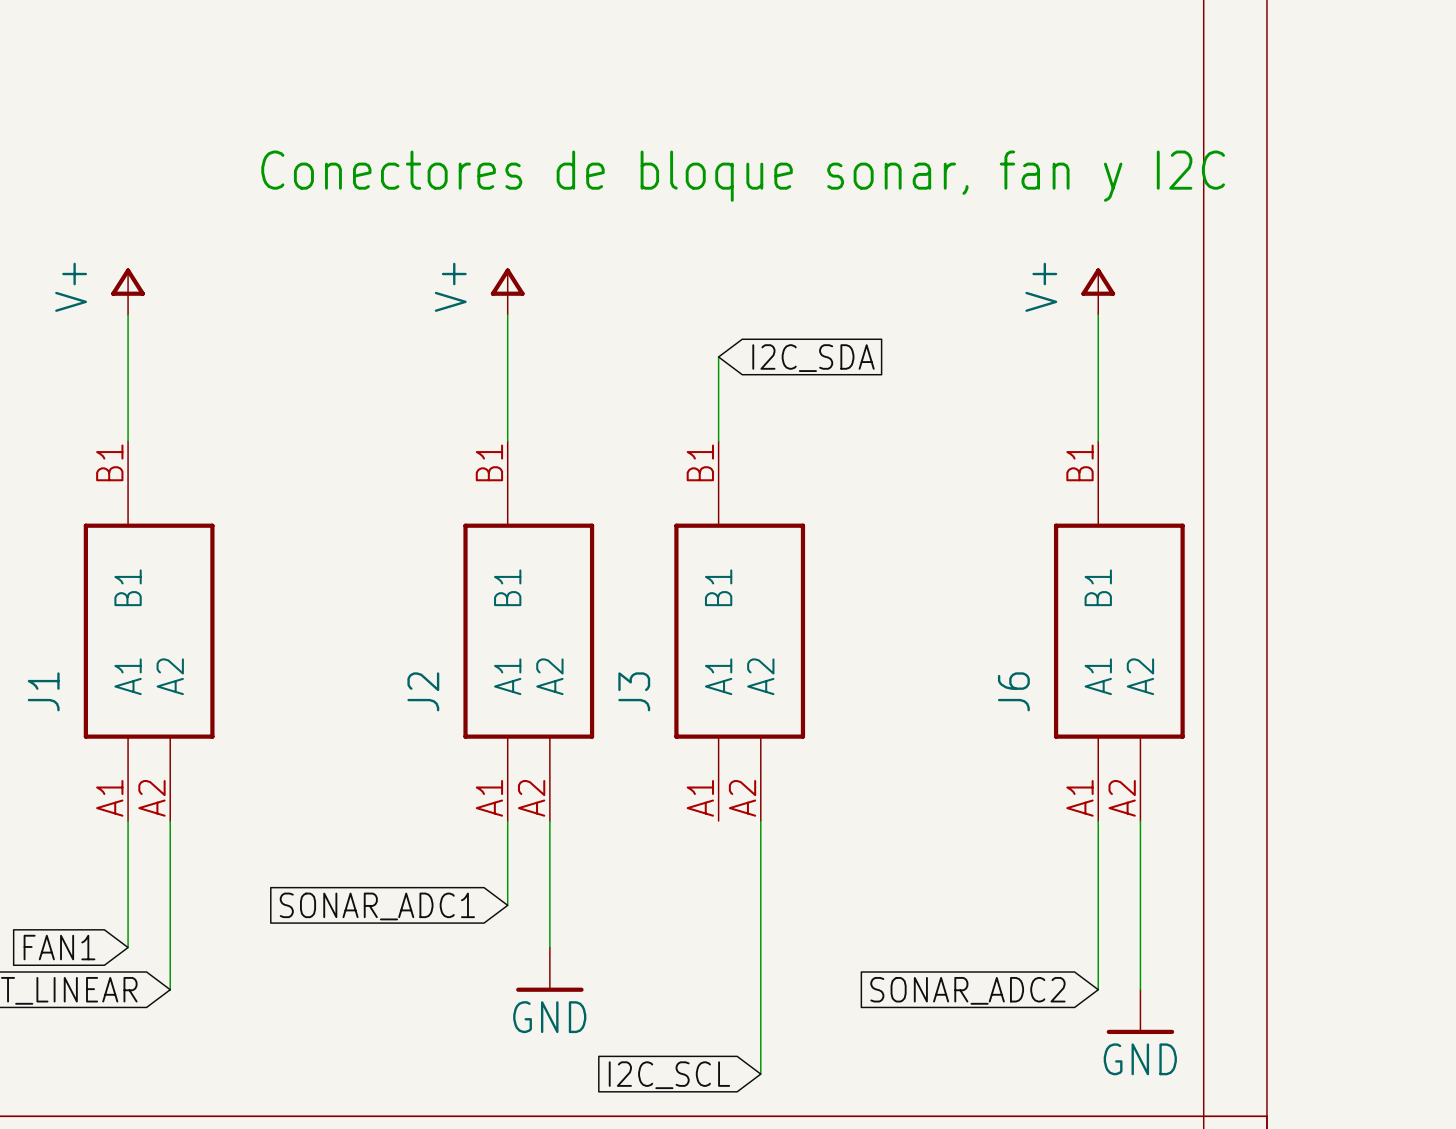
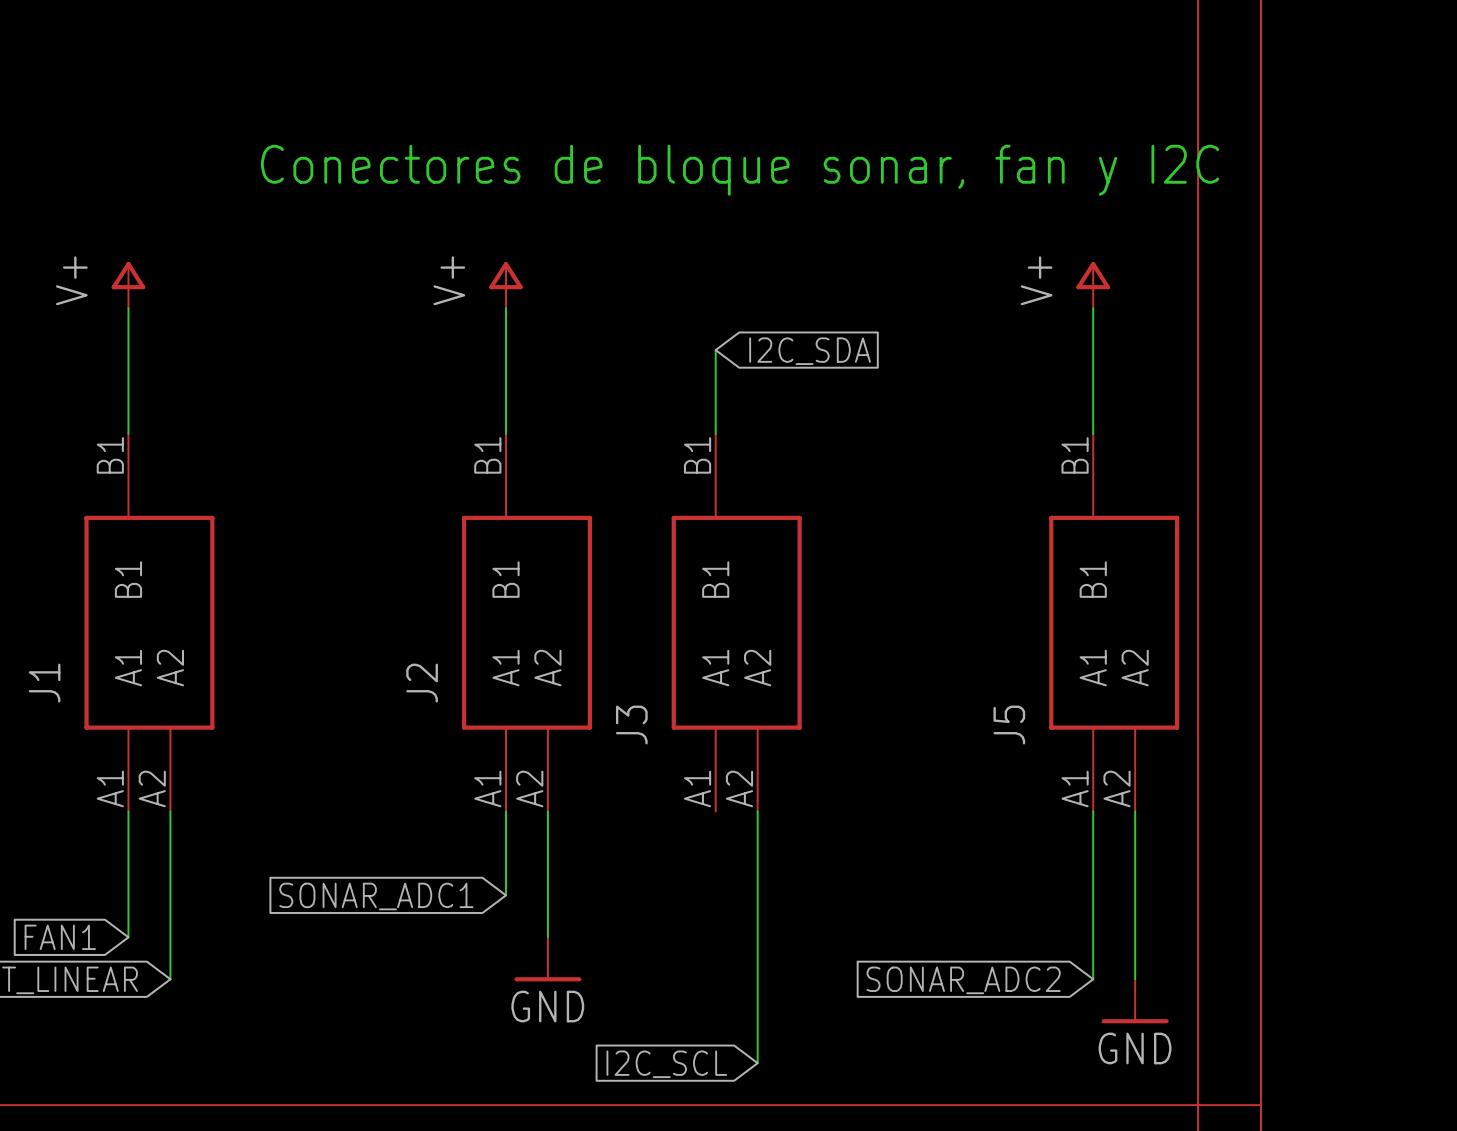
J3 name position: J3 (634, 691) -> J3 (631, 725)
J6 name: J6 (1013, 691) -> J5 (1009, 725)

